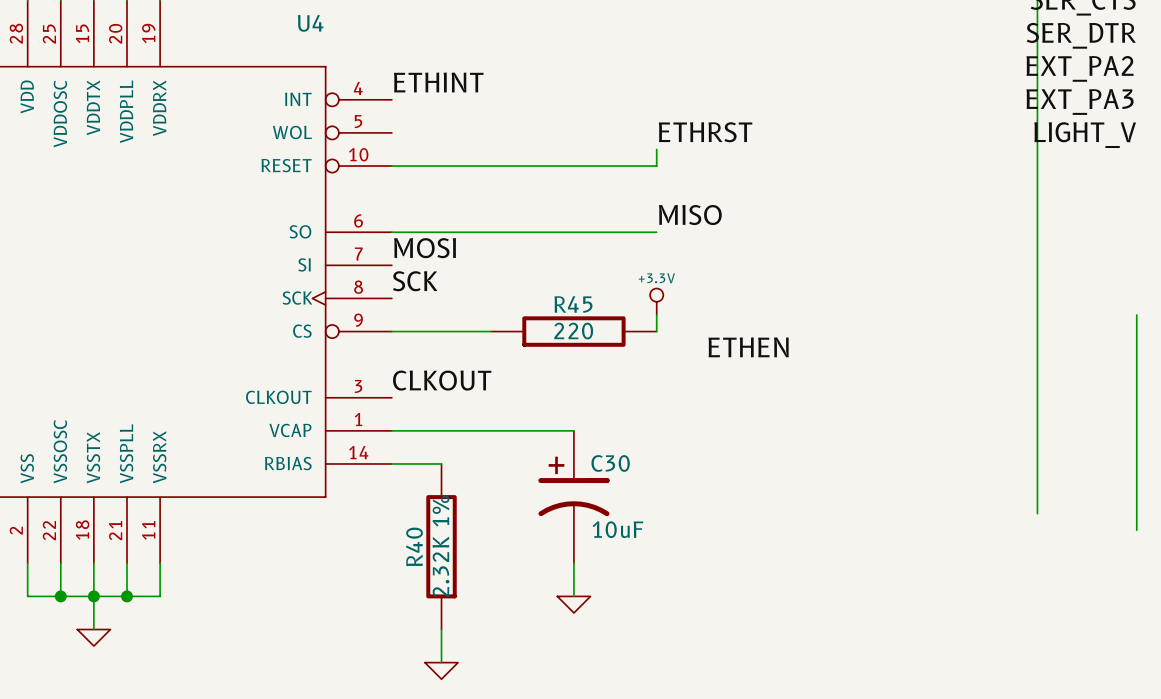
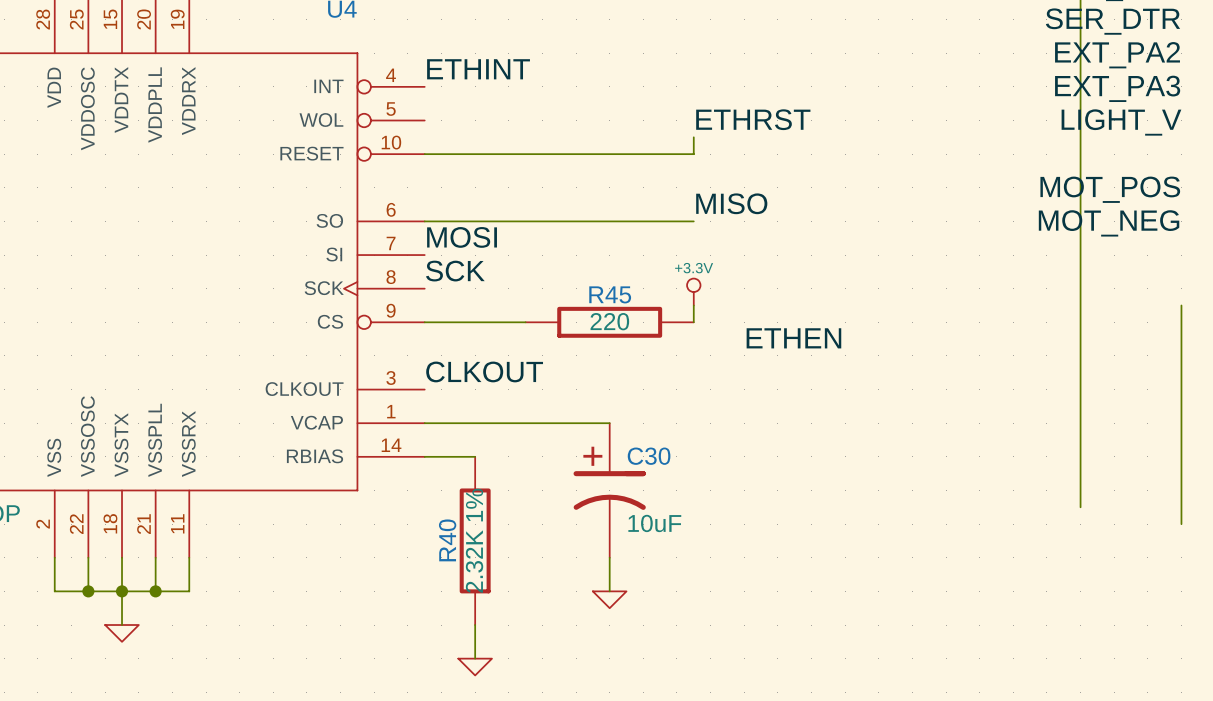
label: none -> MOT_POS (1110, 189)
label: none -> MOT_NEG (1109, 223)

